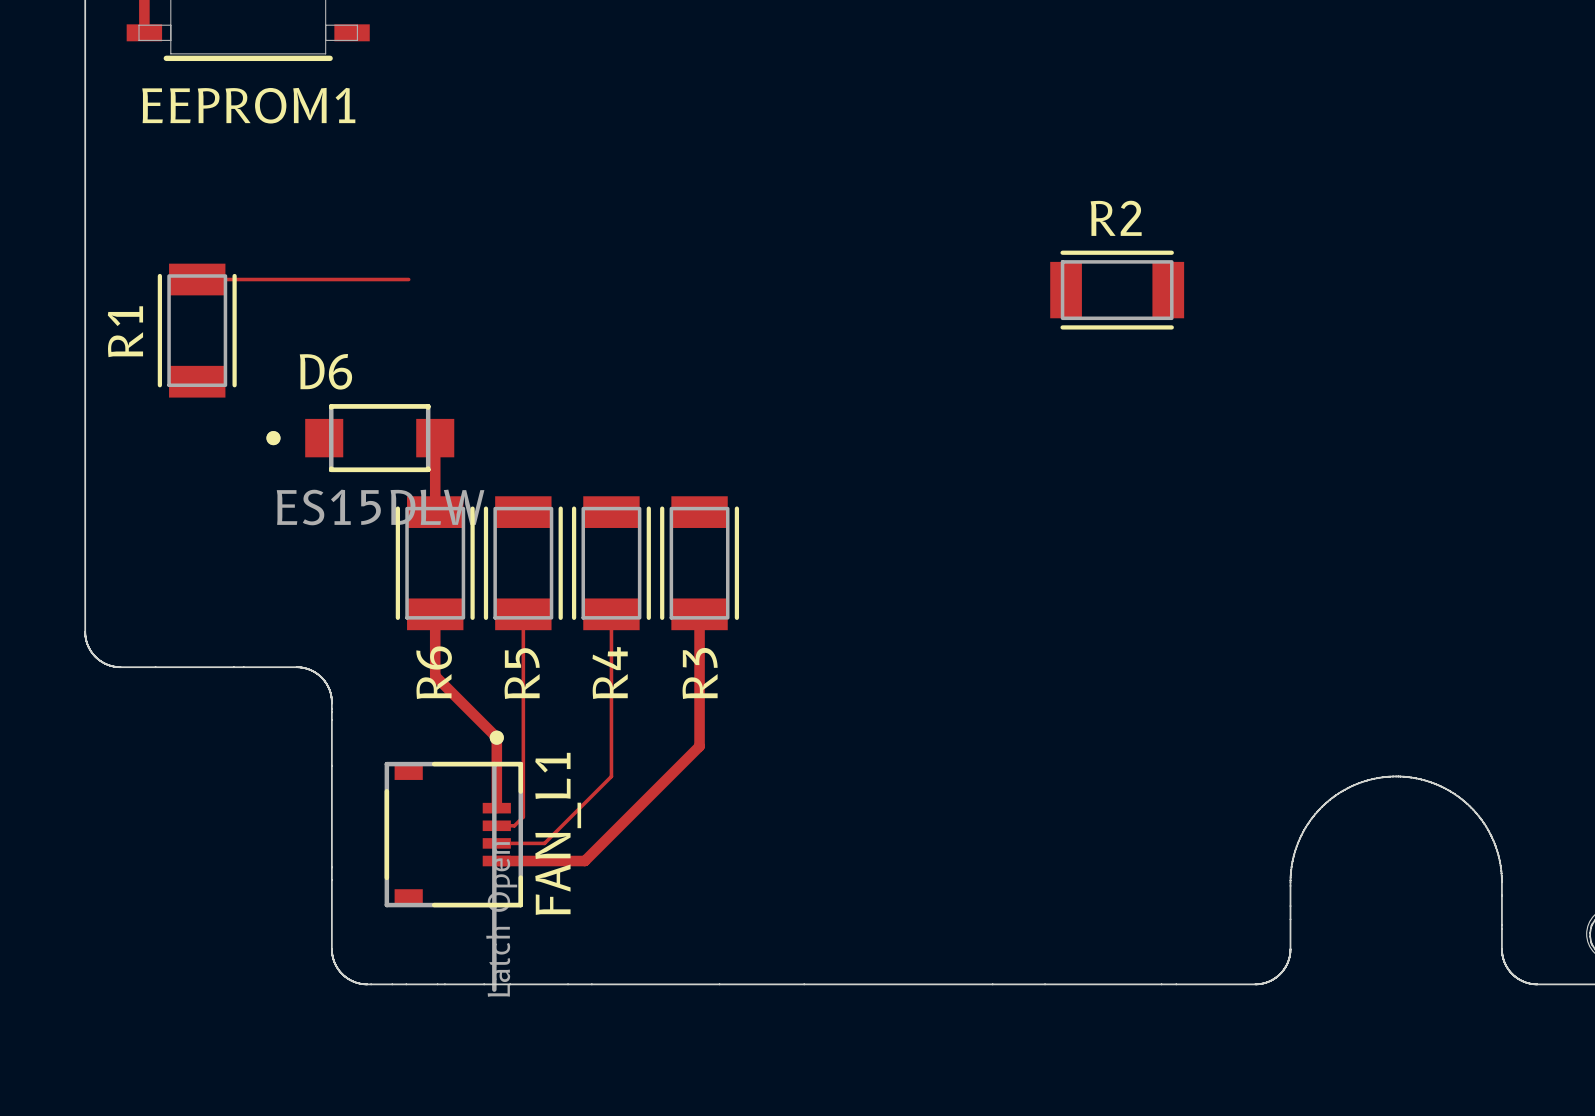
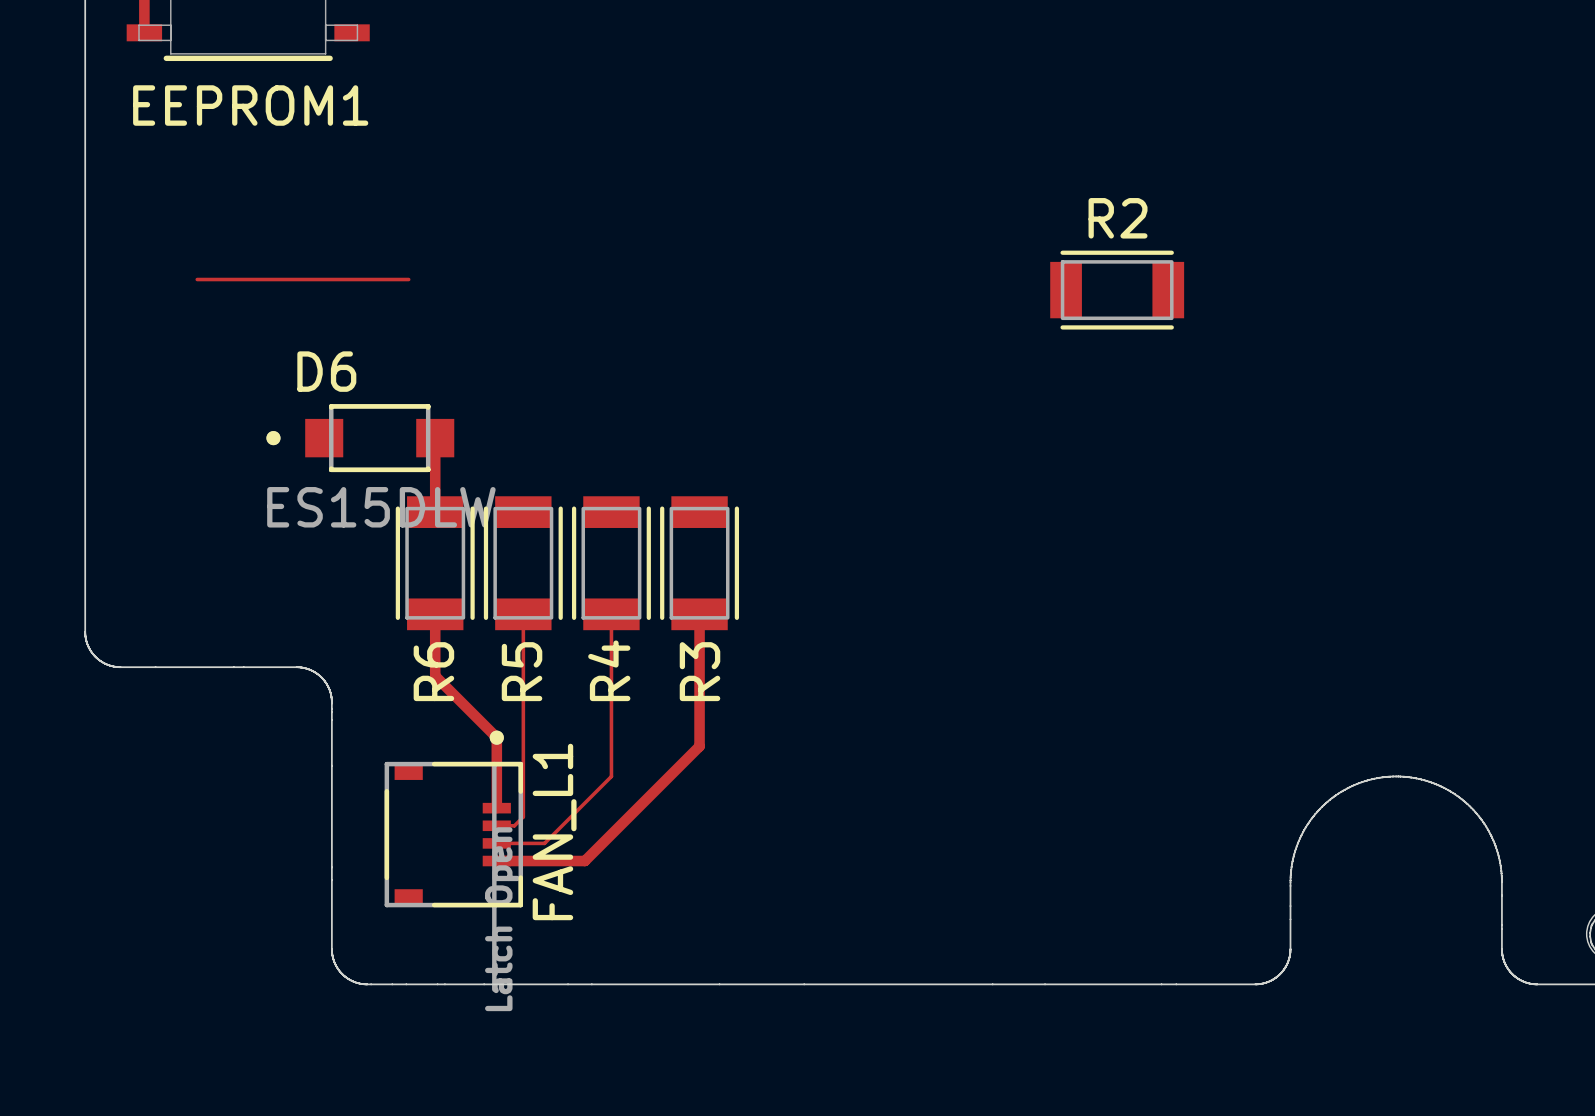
R1: (197, 330) -> none

